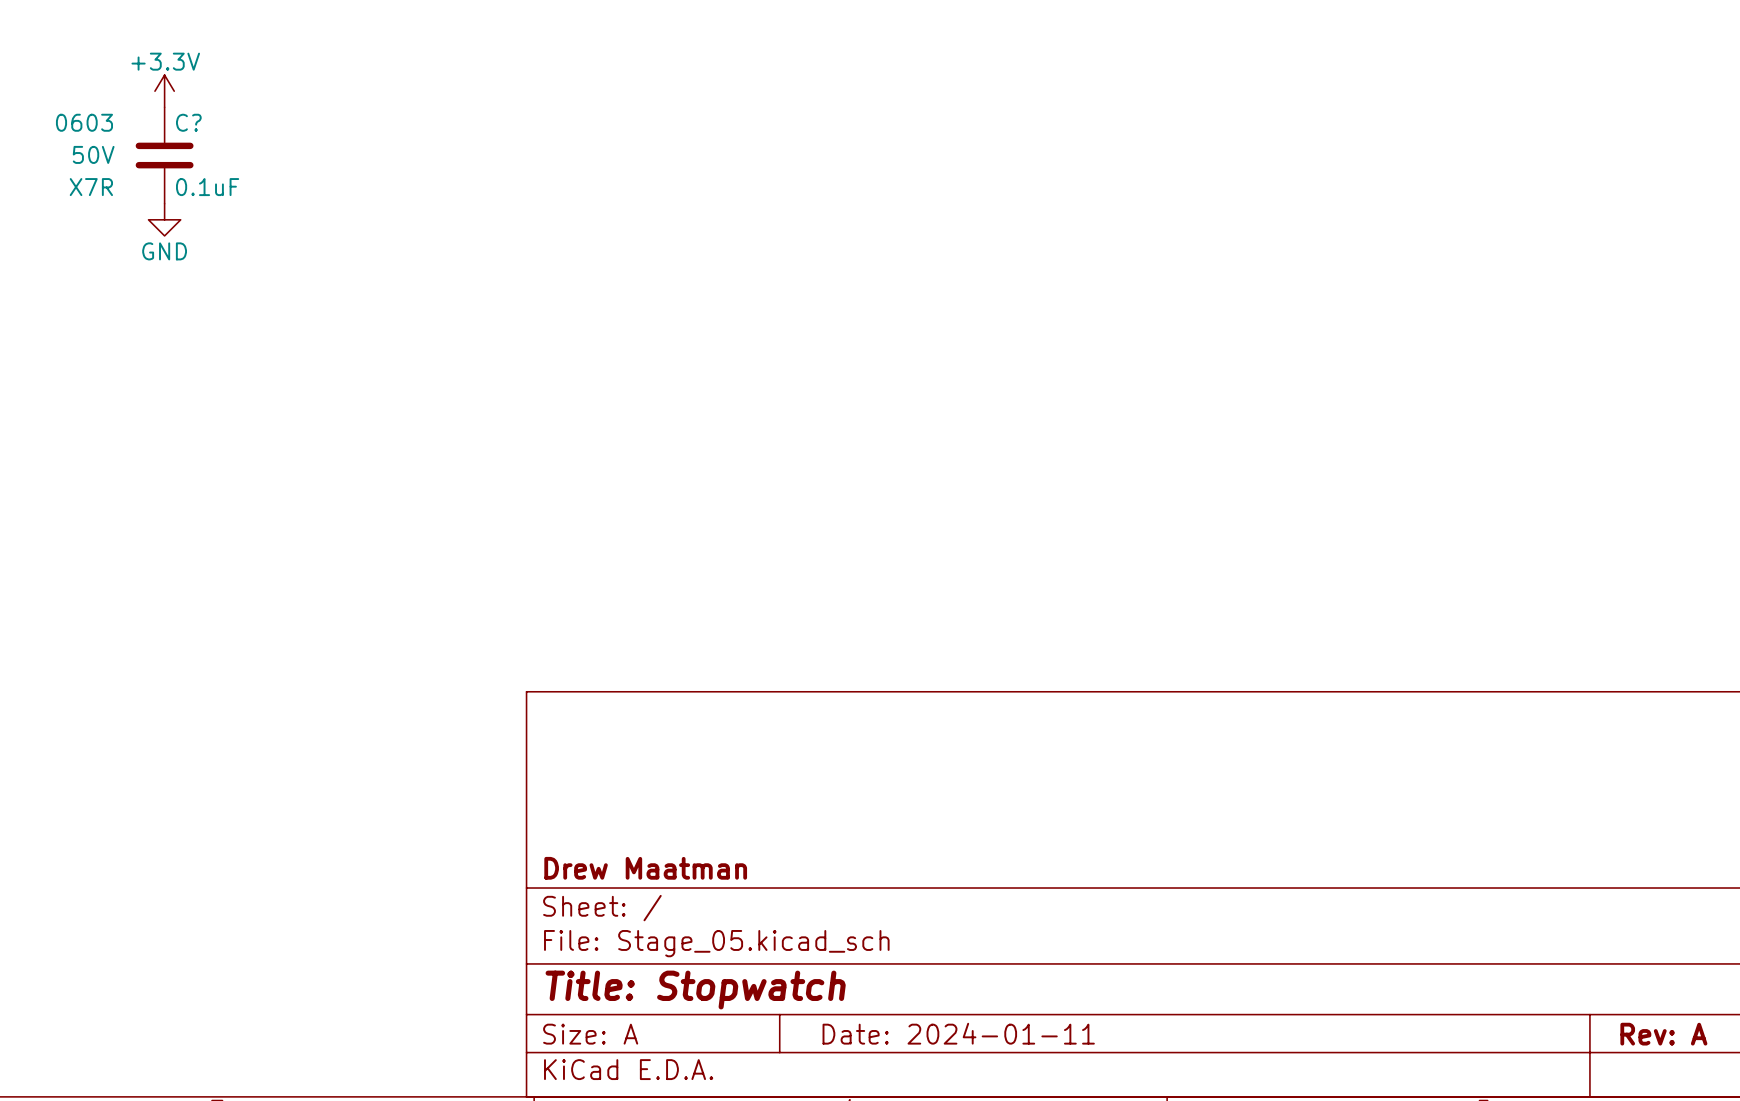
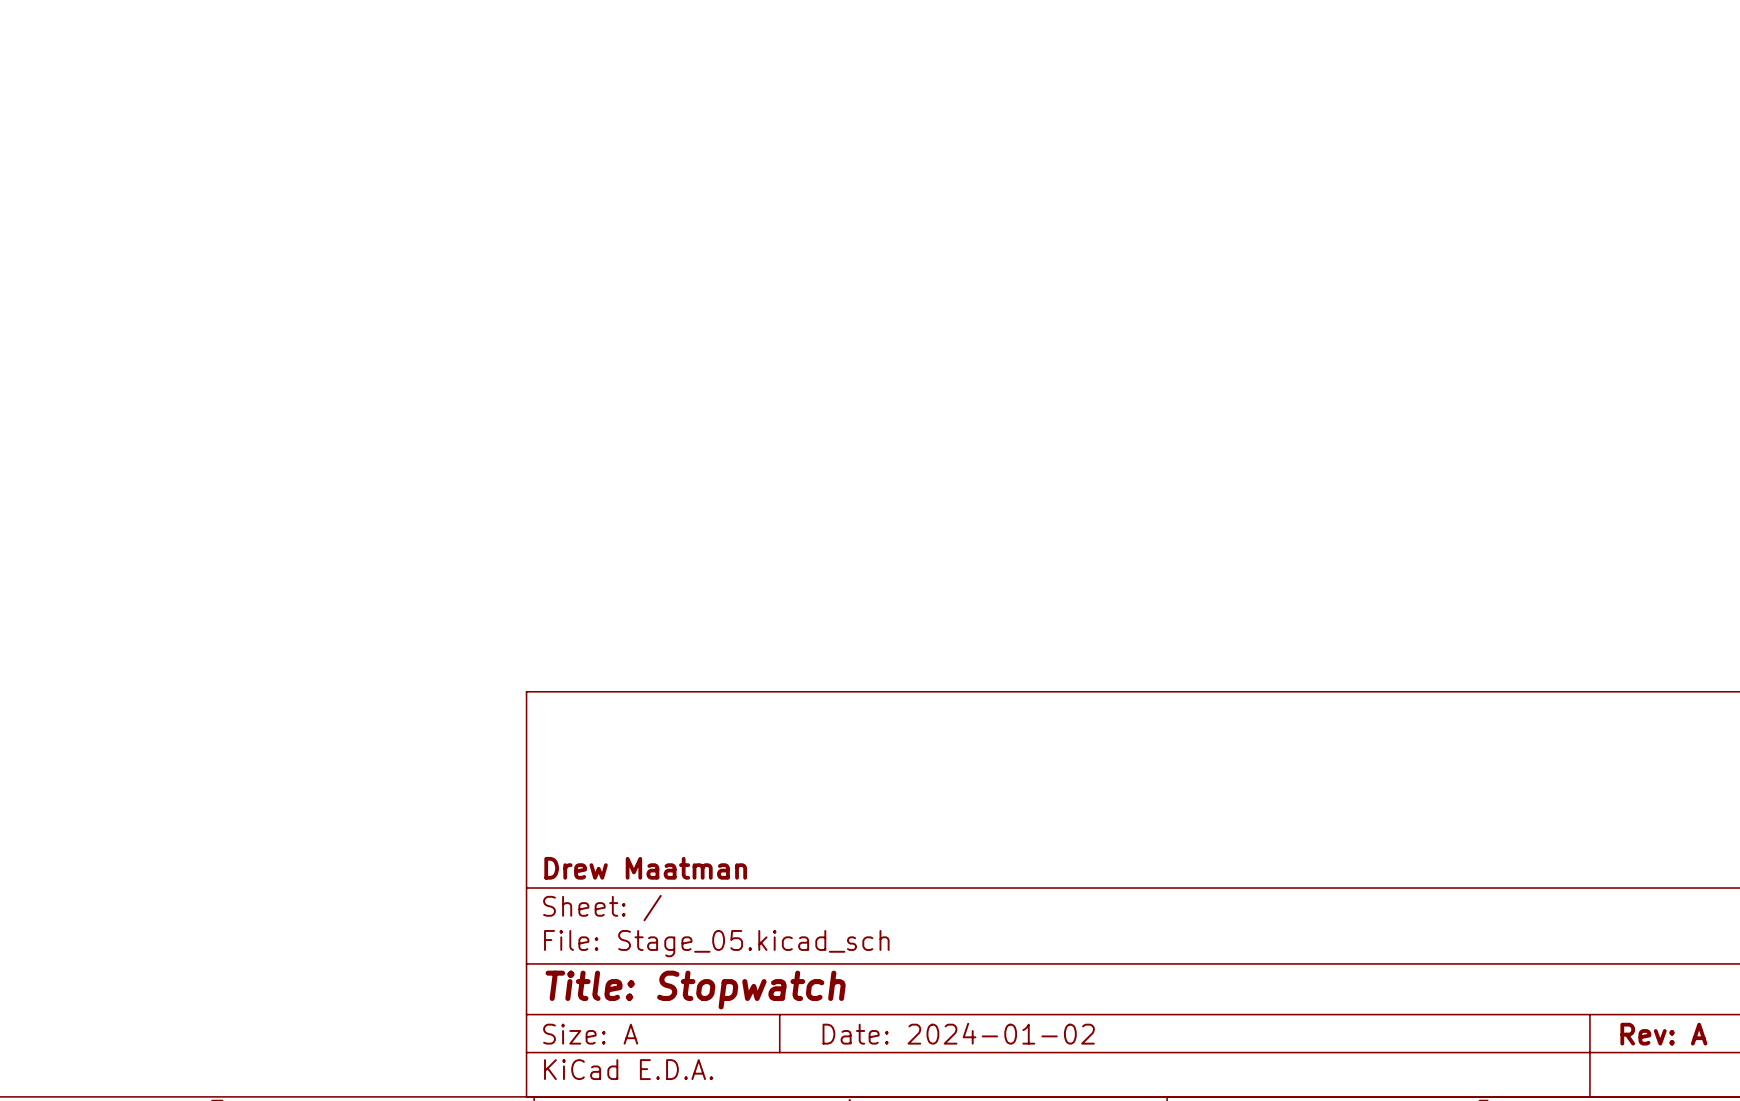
power symbol: +3.3V (164, 91) -> none
C?: 0.1uF (164, 155) -> none
power symbol: GND (164, 219) -> none
title block: Date: 2024-01-11 (958, 1033) -> Date: 2024-01-02 (958, 1033)

